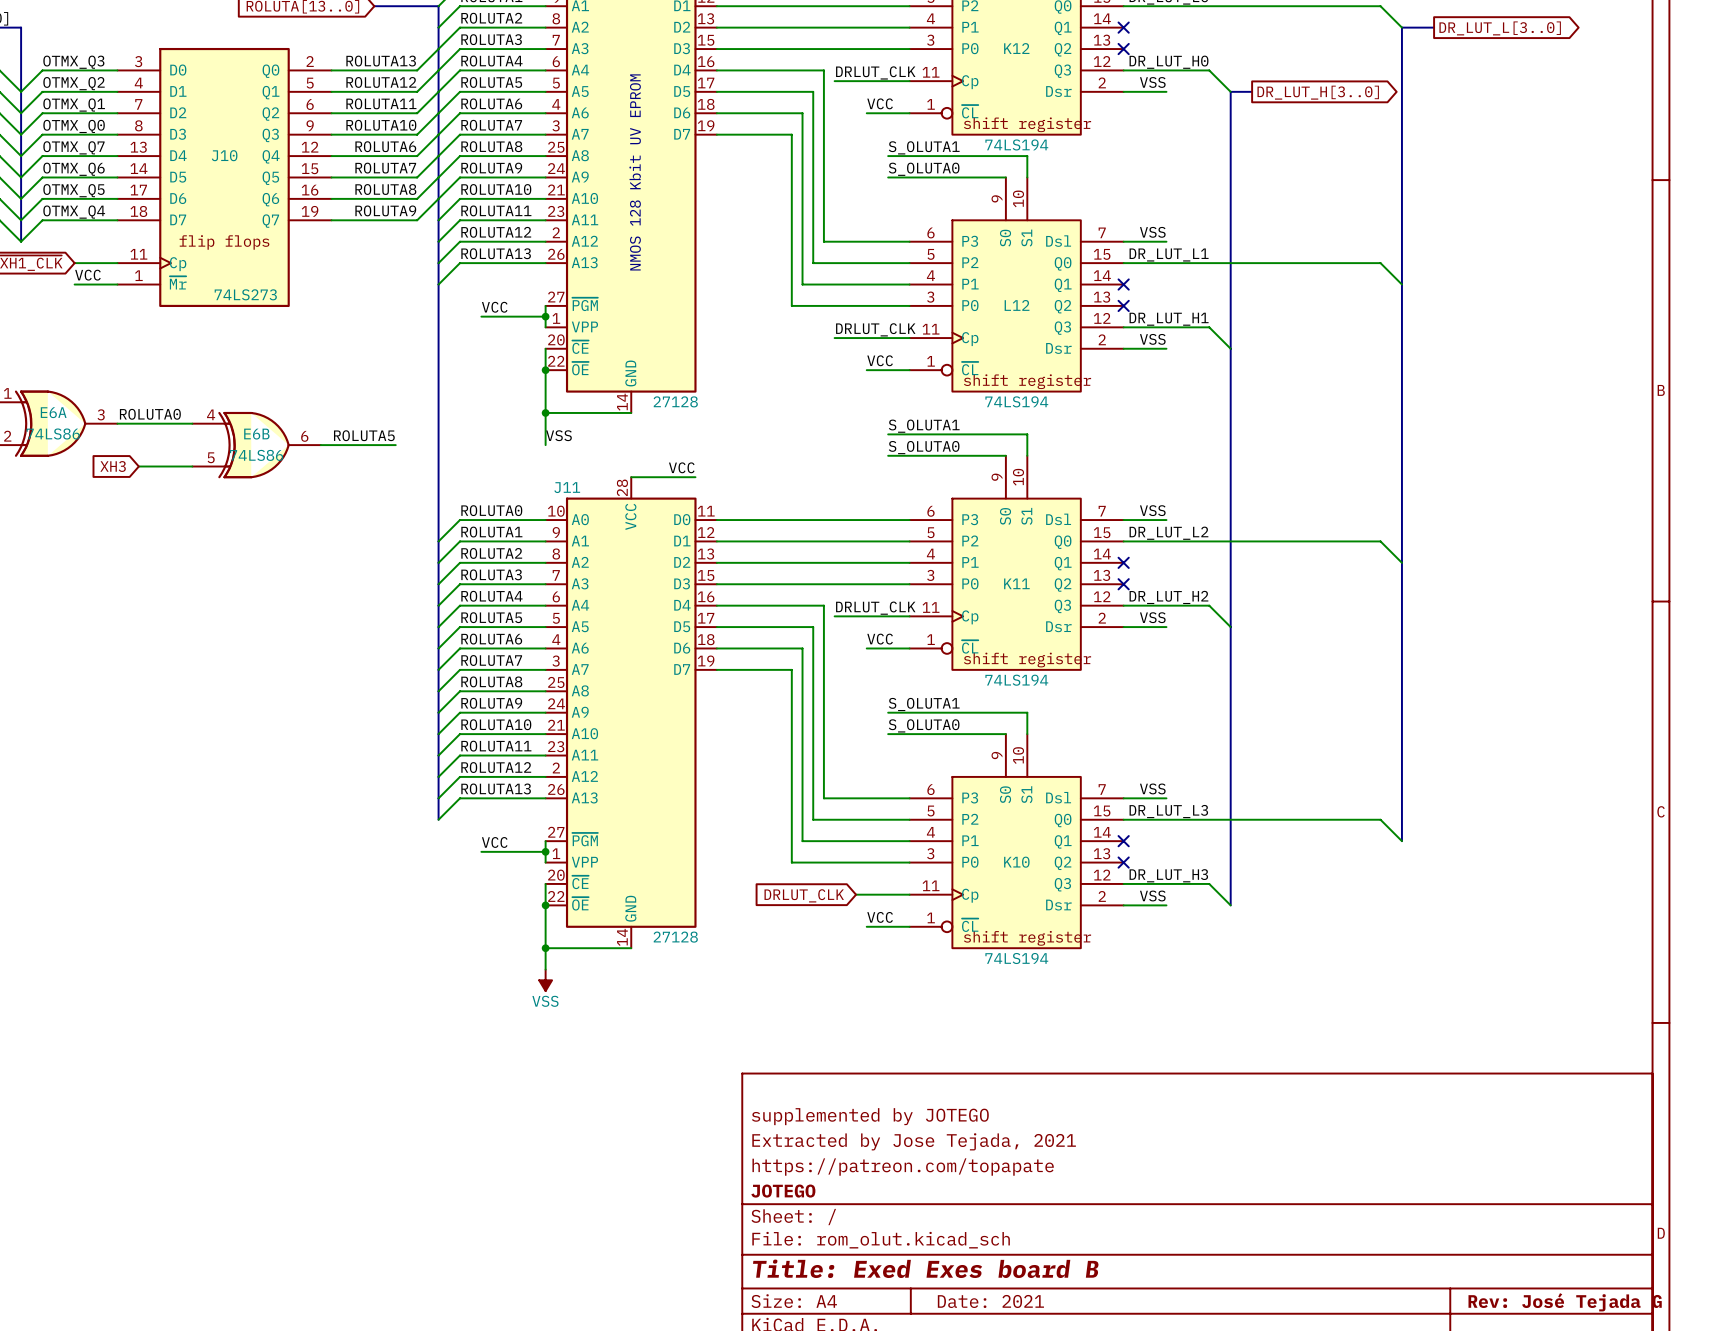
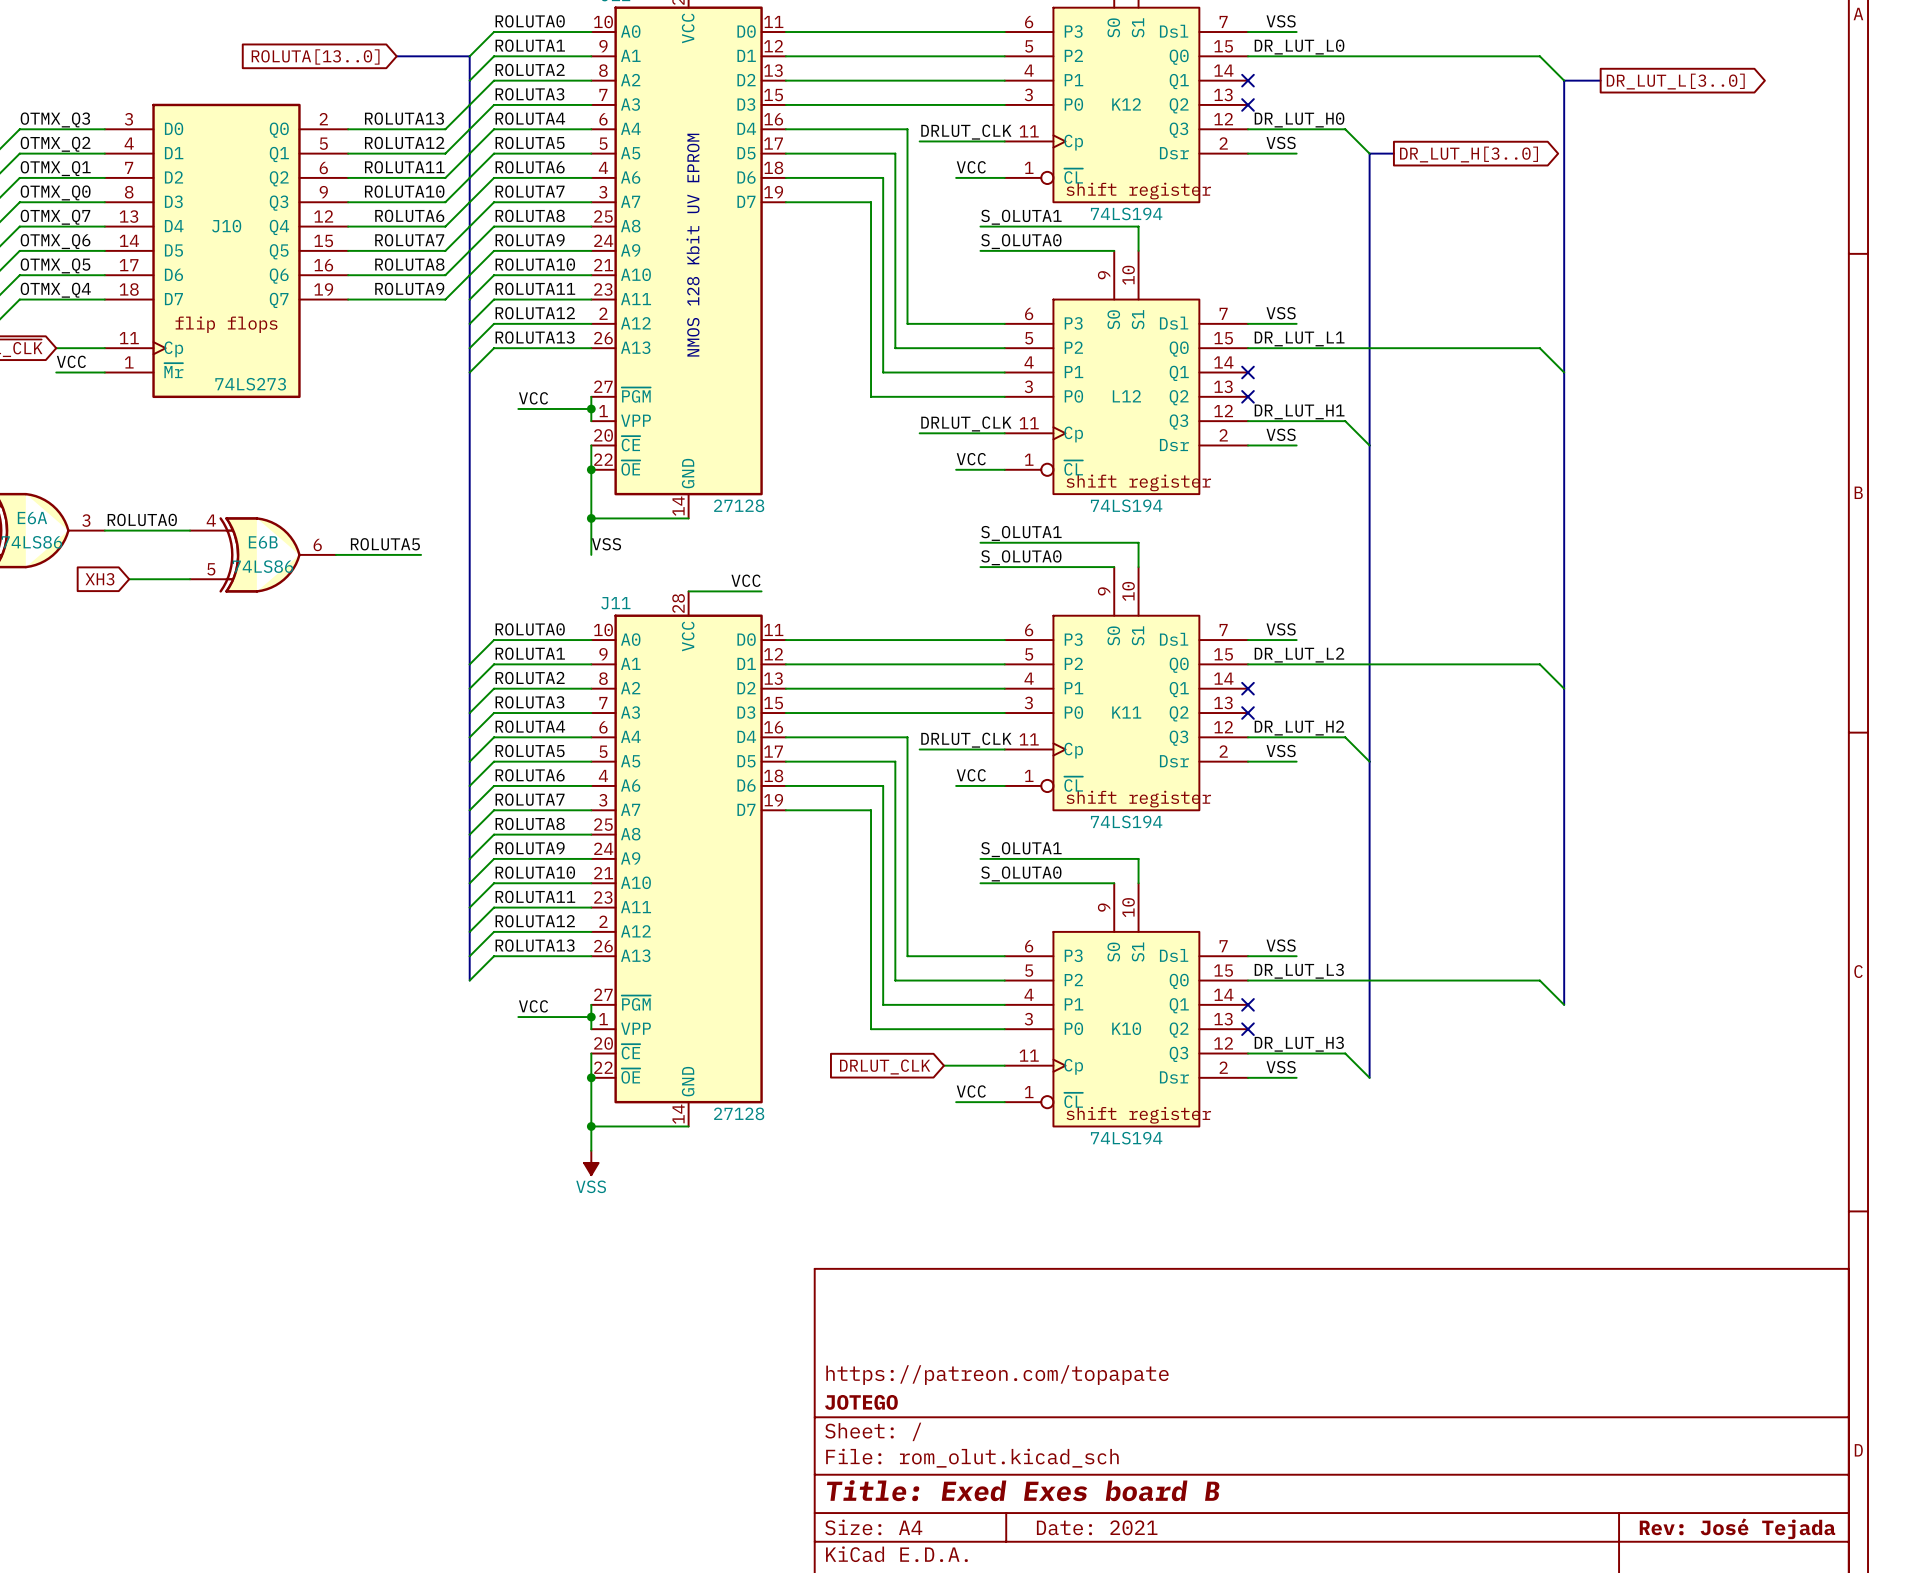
title block: supplemented by JOTEGO (870, 1116) -> none
title block: Extracted by Jose Tejada, 2021 (914, 1141) -> none
title block: Rev: José Tejada G (1565, 1302) -> Rev: José Tejada (1737, 1528)

